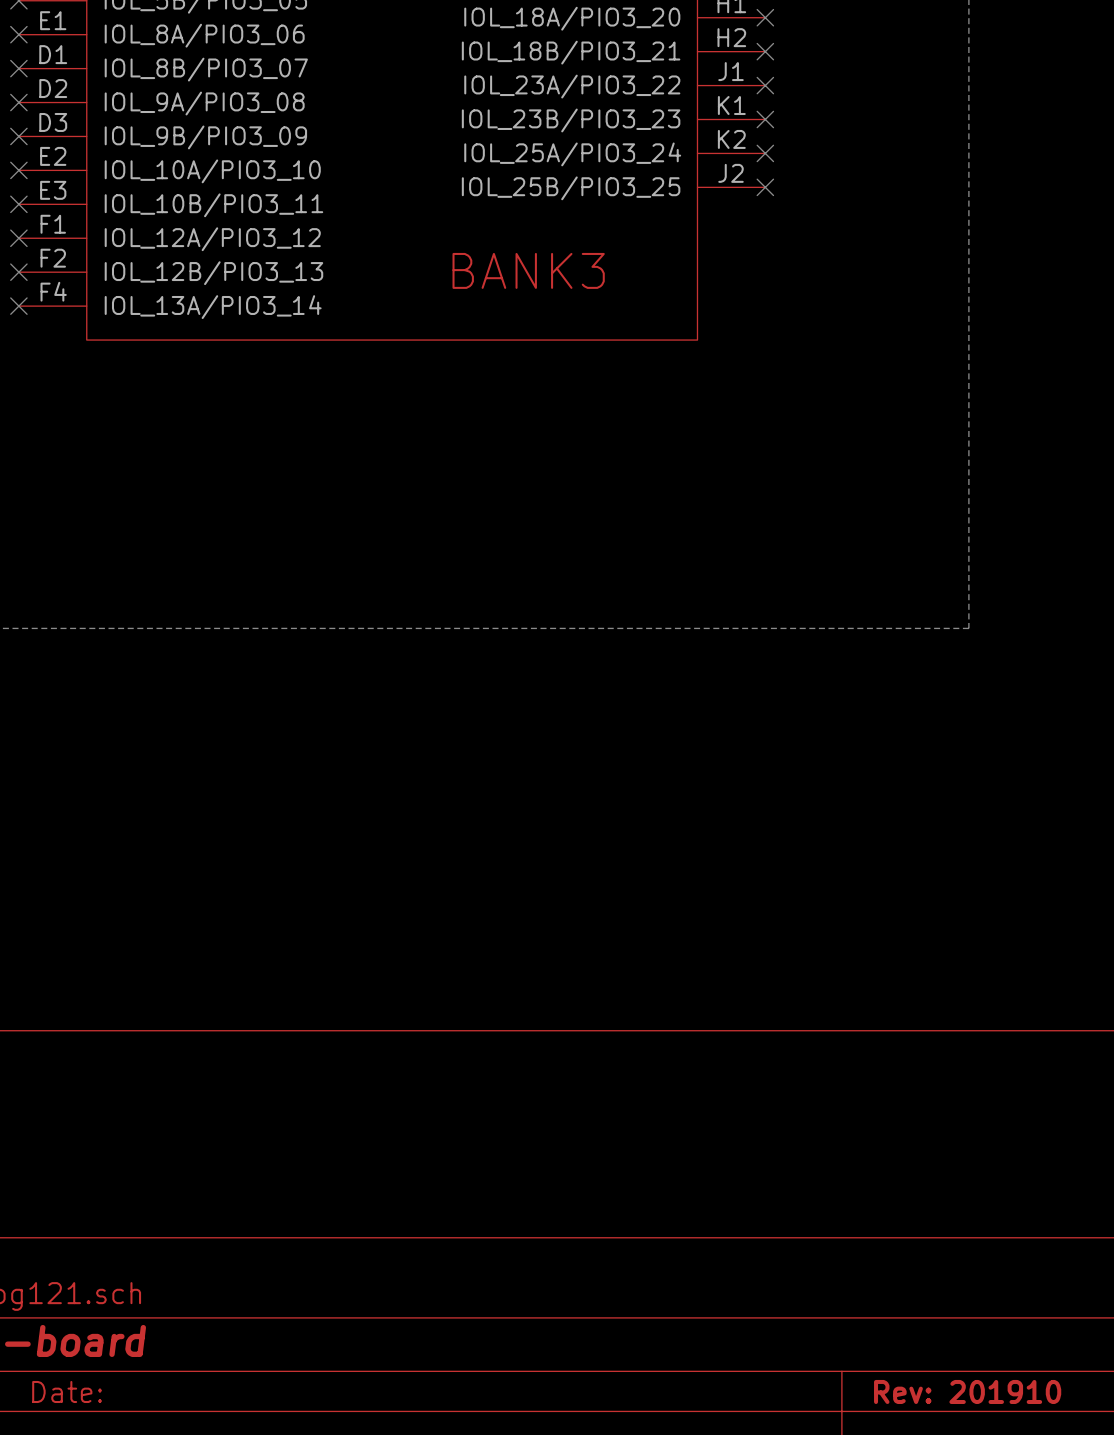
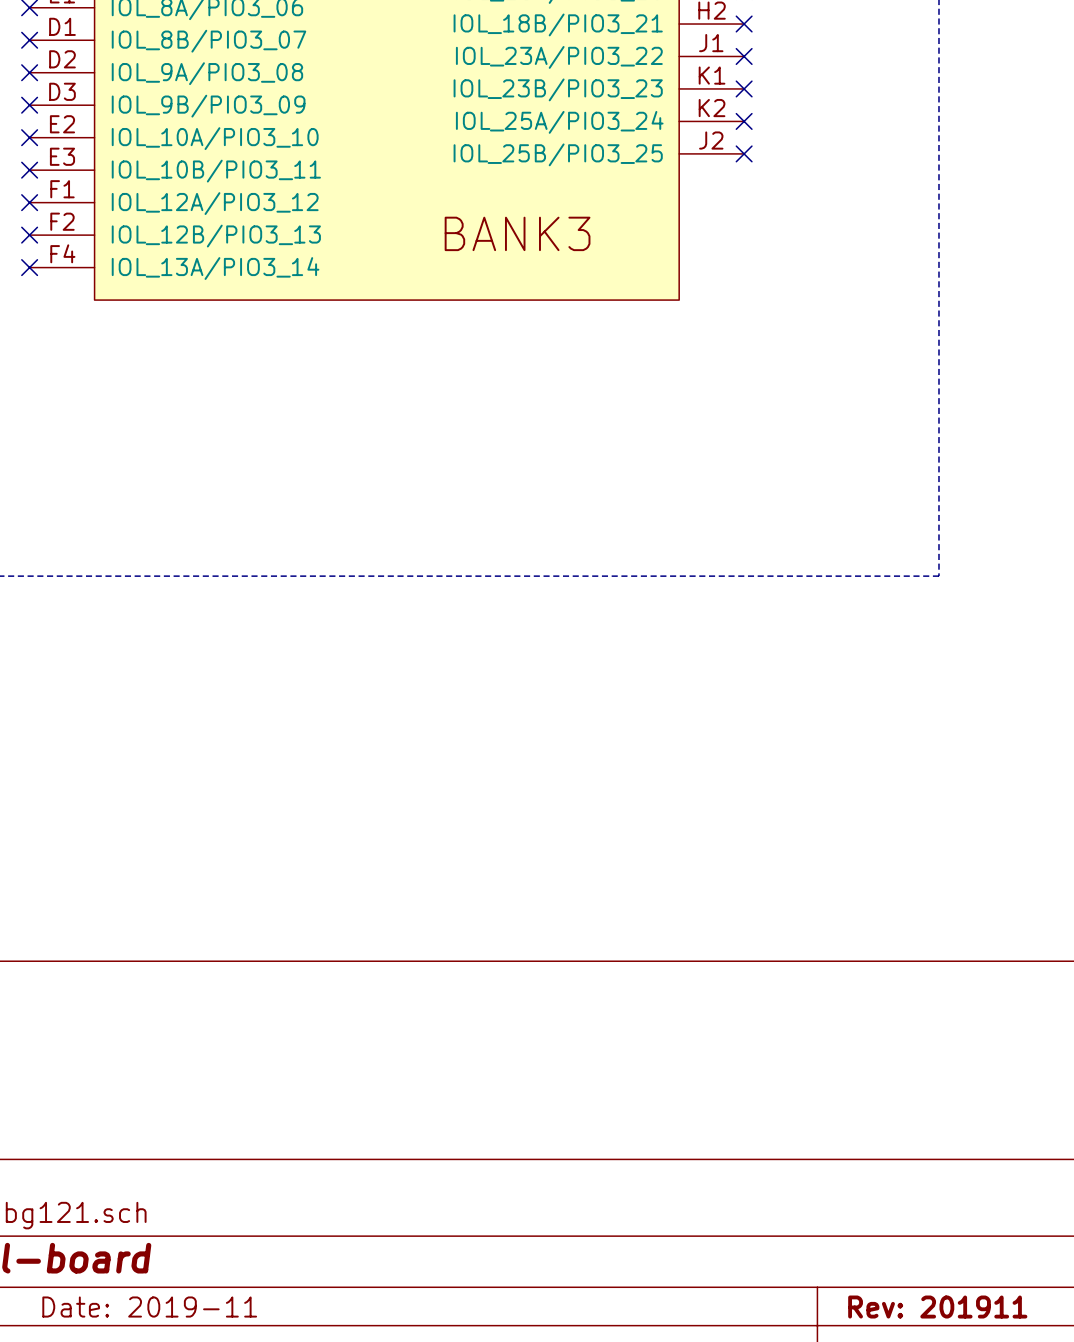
title block: Date: (67, 1391) -> Date: 2019-11 (149, 1307)
title block: Rev: 201910 (967, 1391) -> Rev: 201911 (937, 1307)

